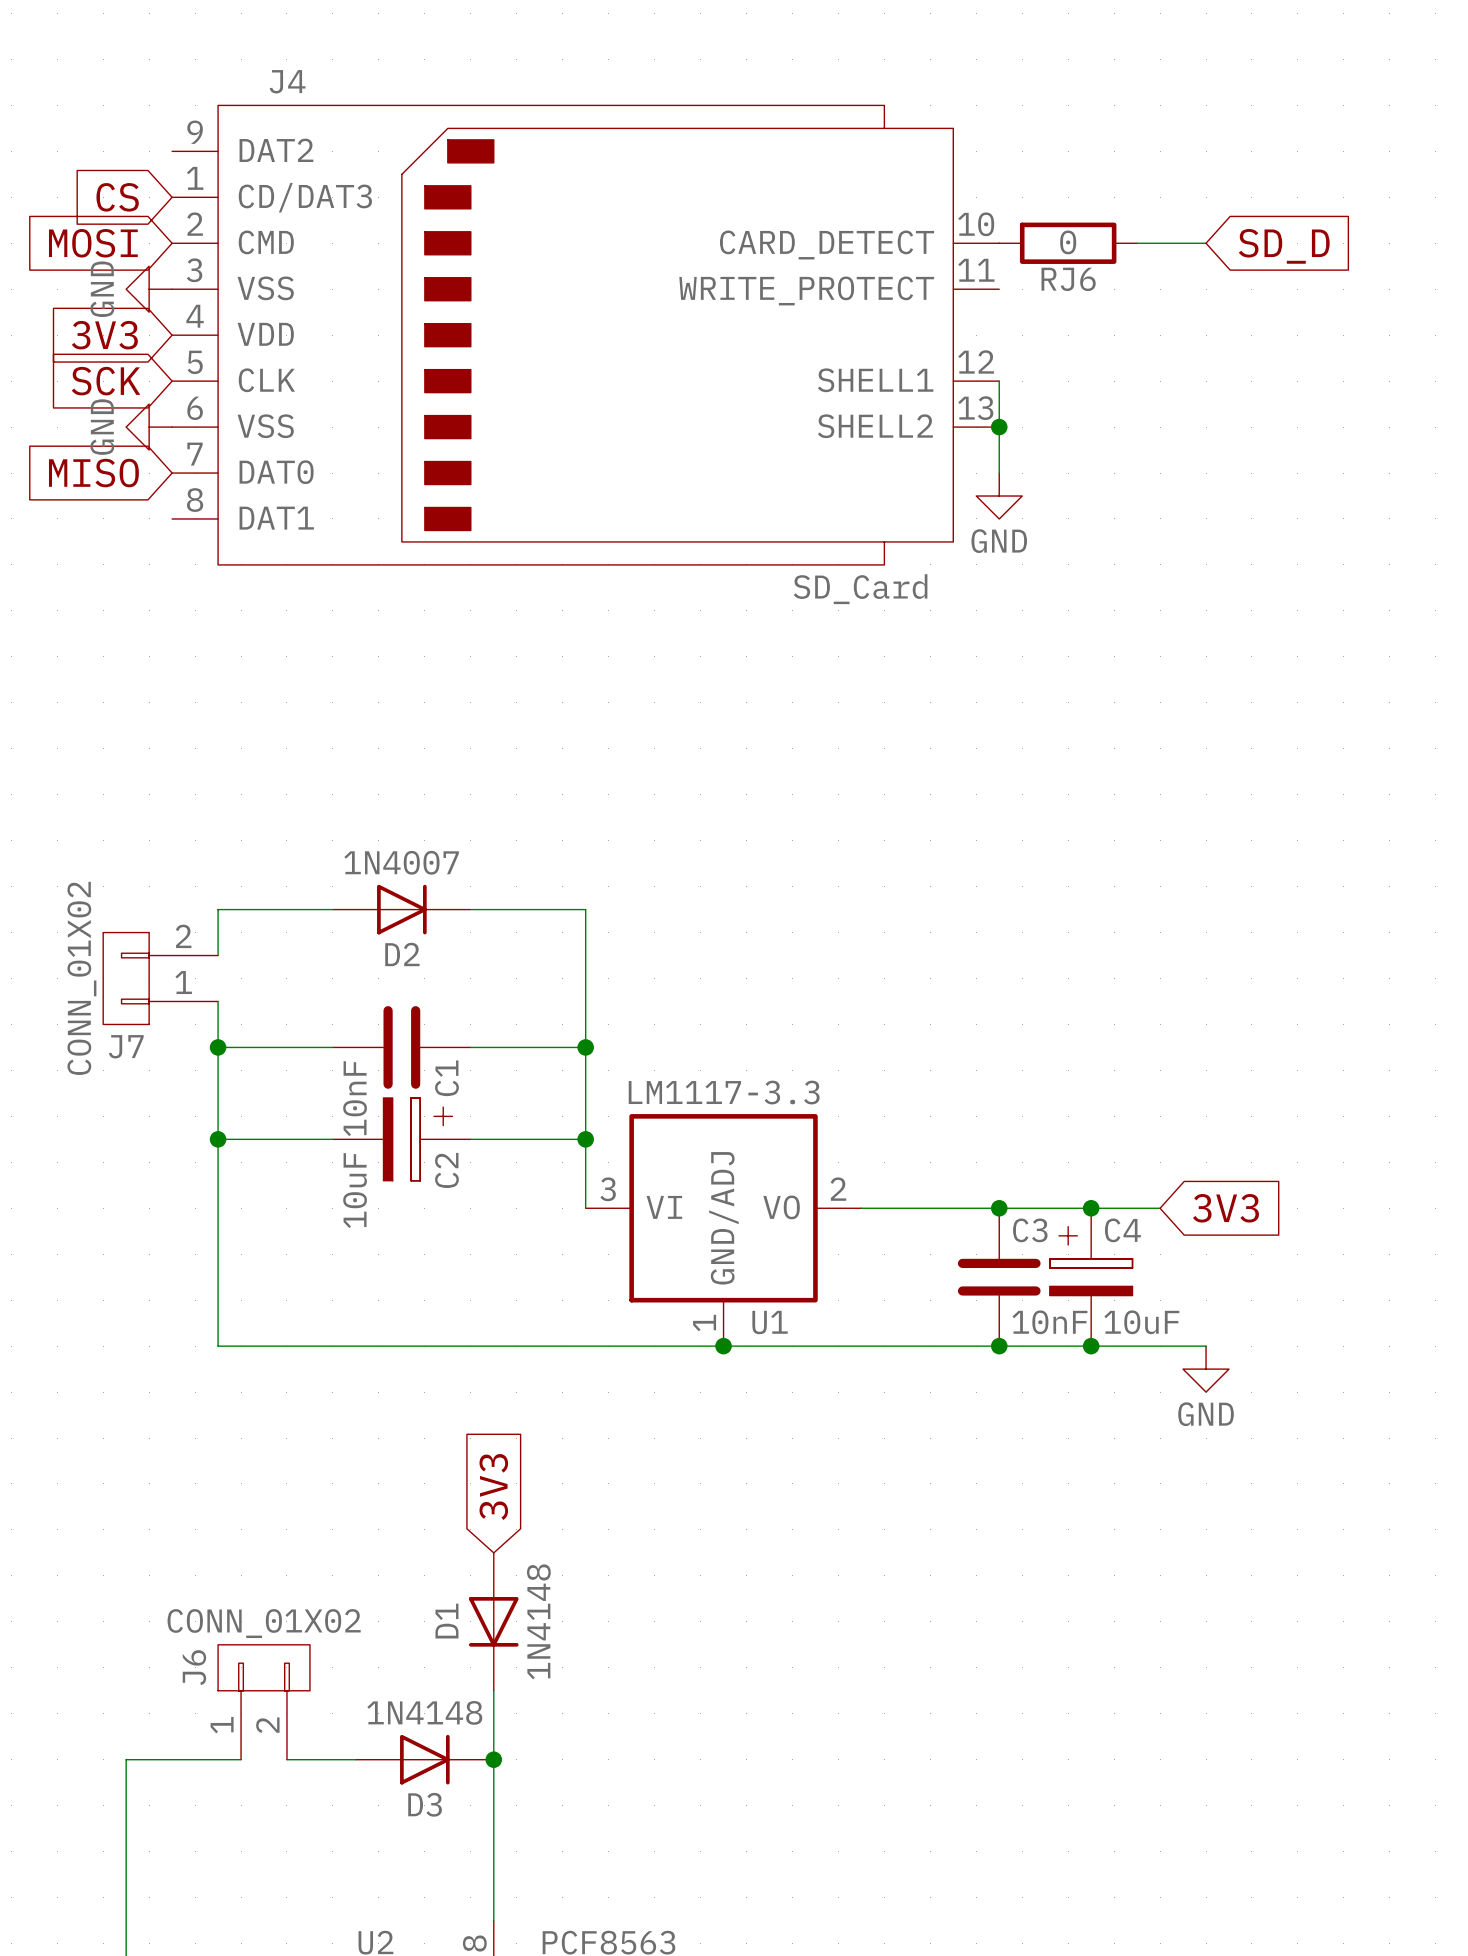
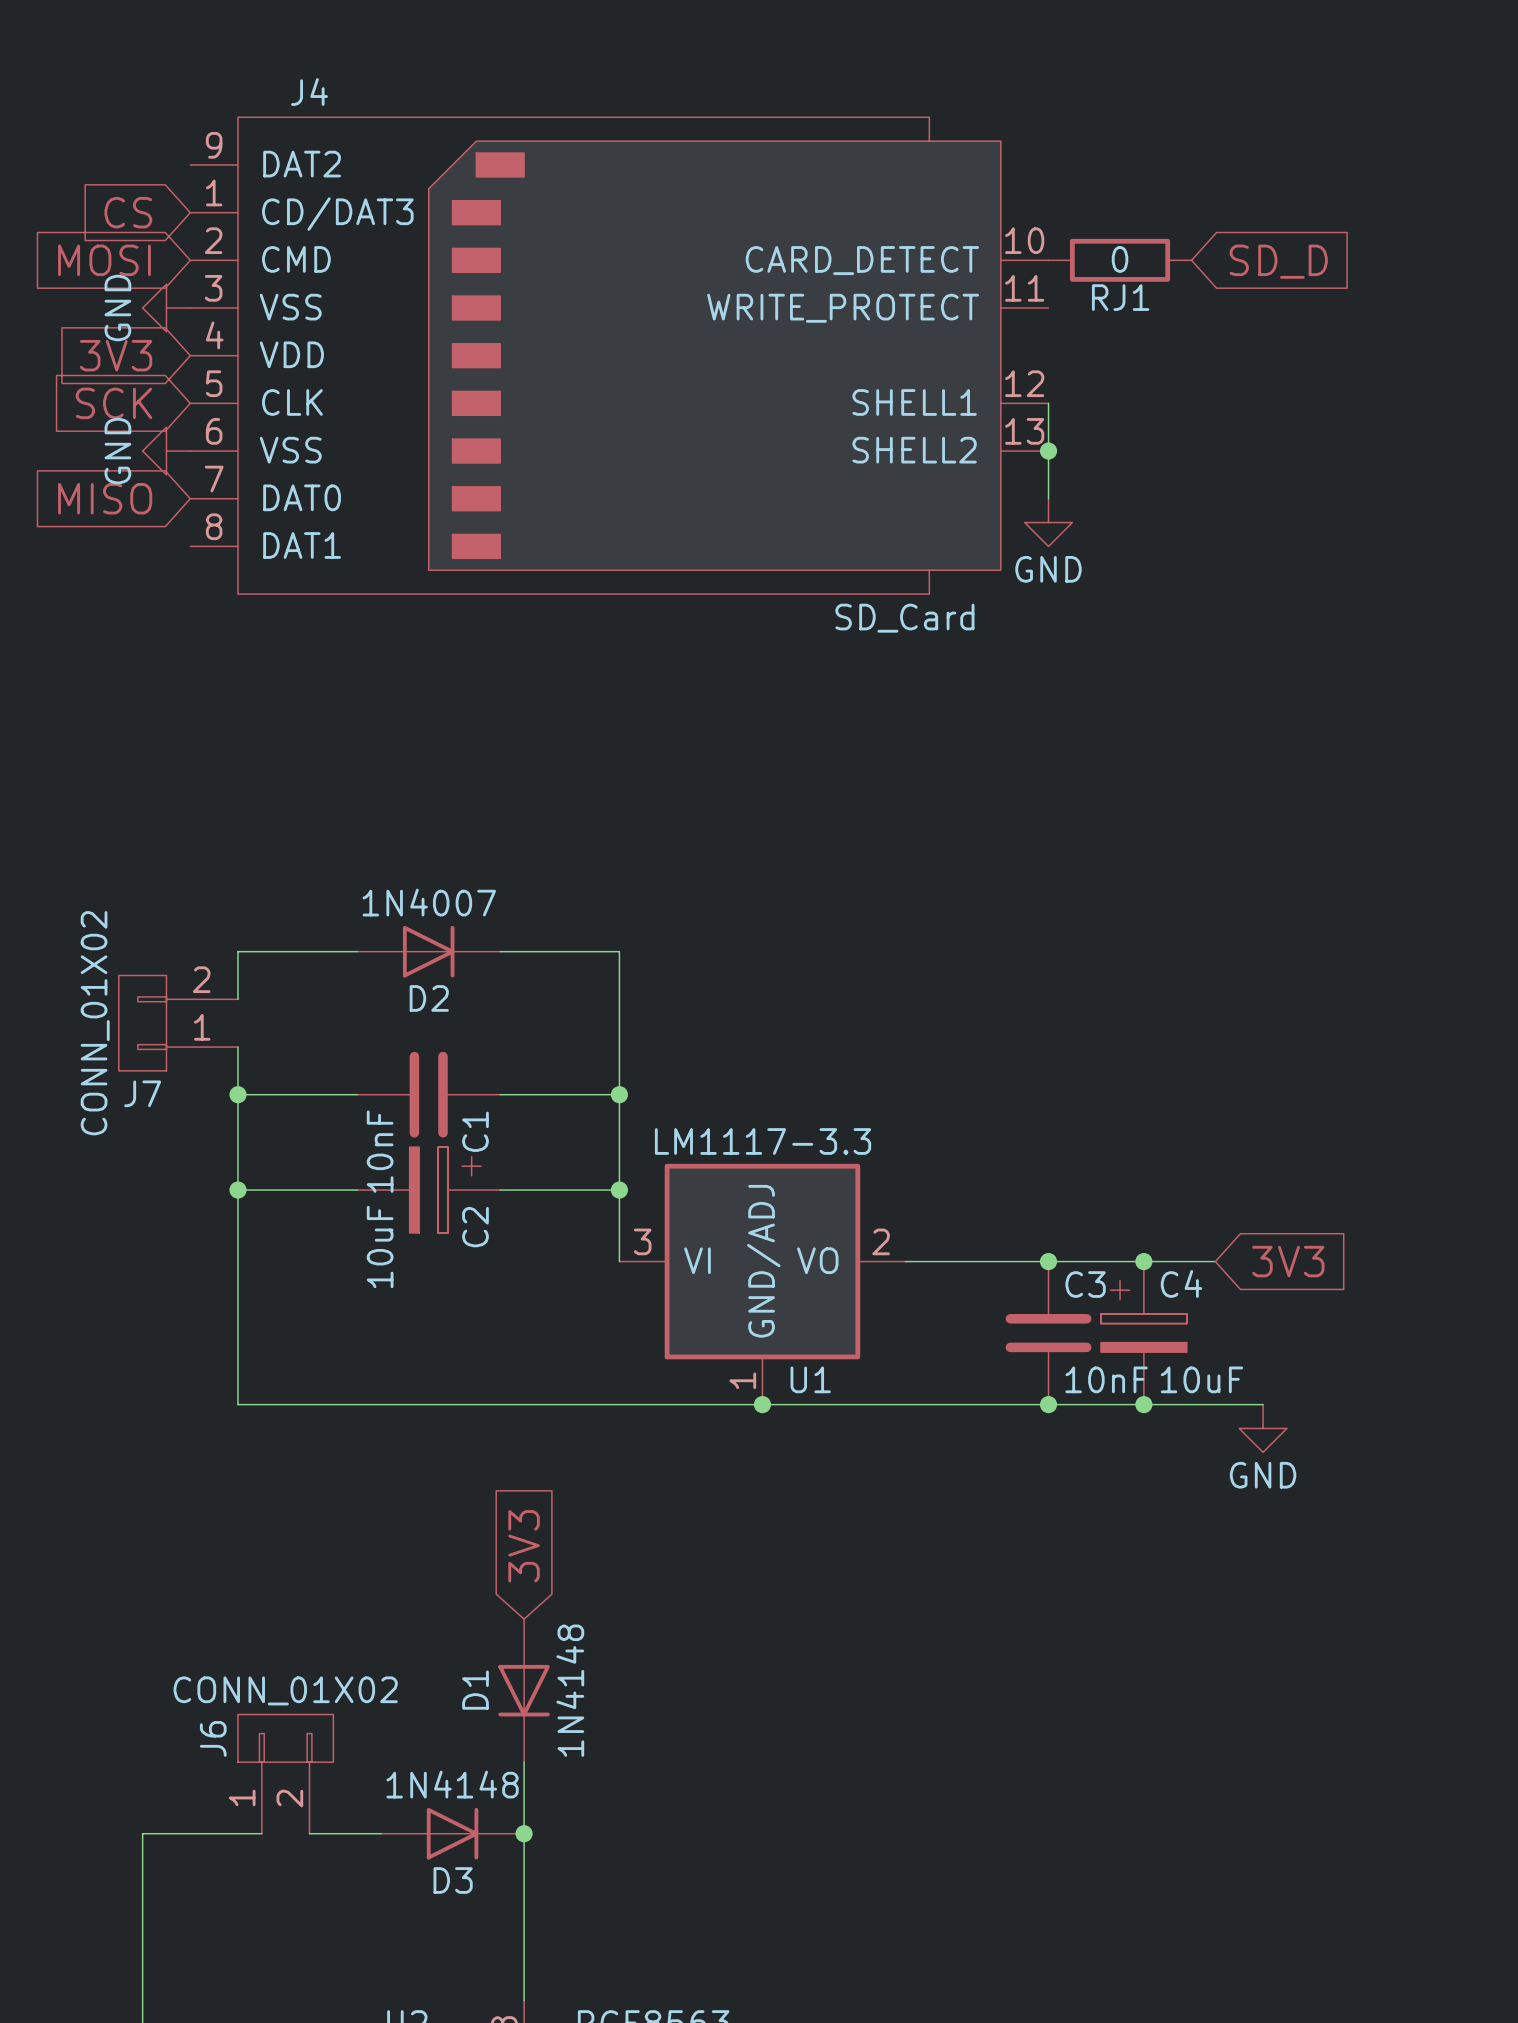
wire: (1137, 243) (1206, 243) -> none
global label position: SD_D (1284, 246) -> SD_D (1278, 261)
RJ6 name: RJ6 (1068, 279) -> RJ1 (1120, 297)

